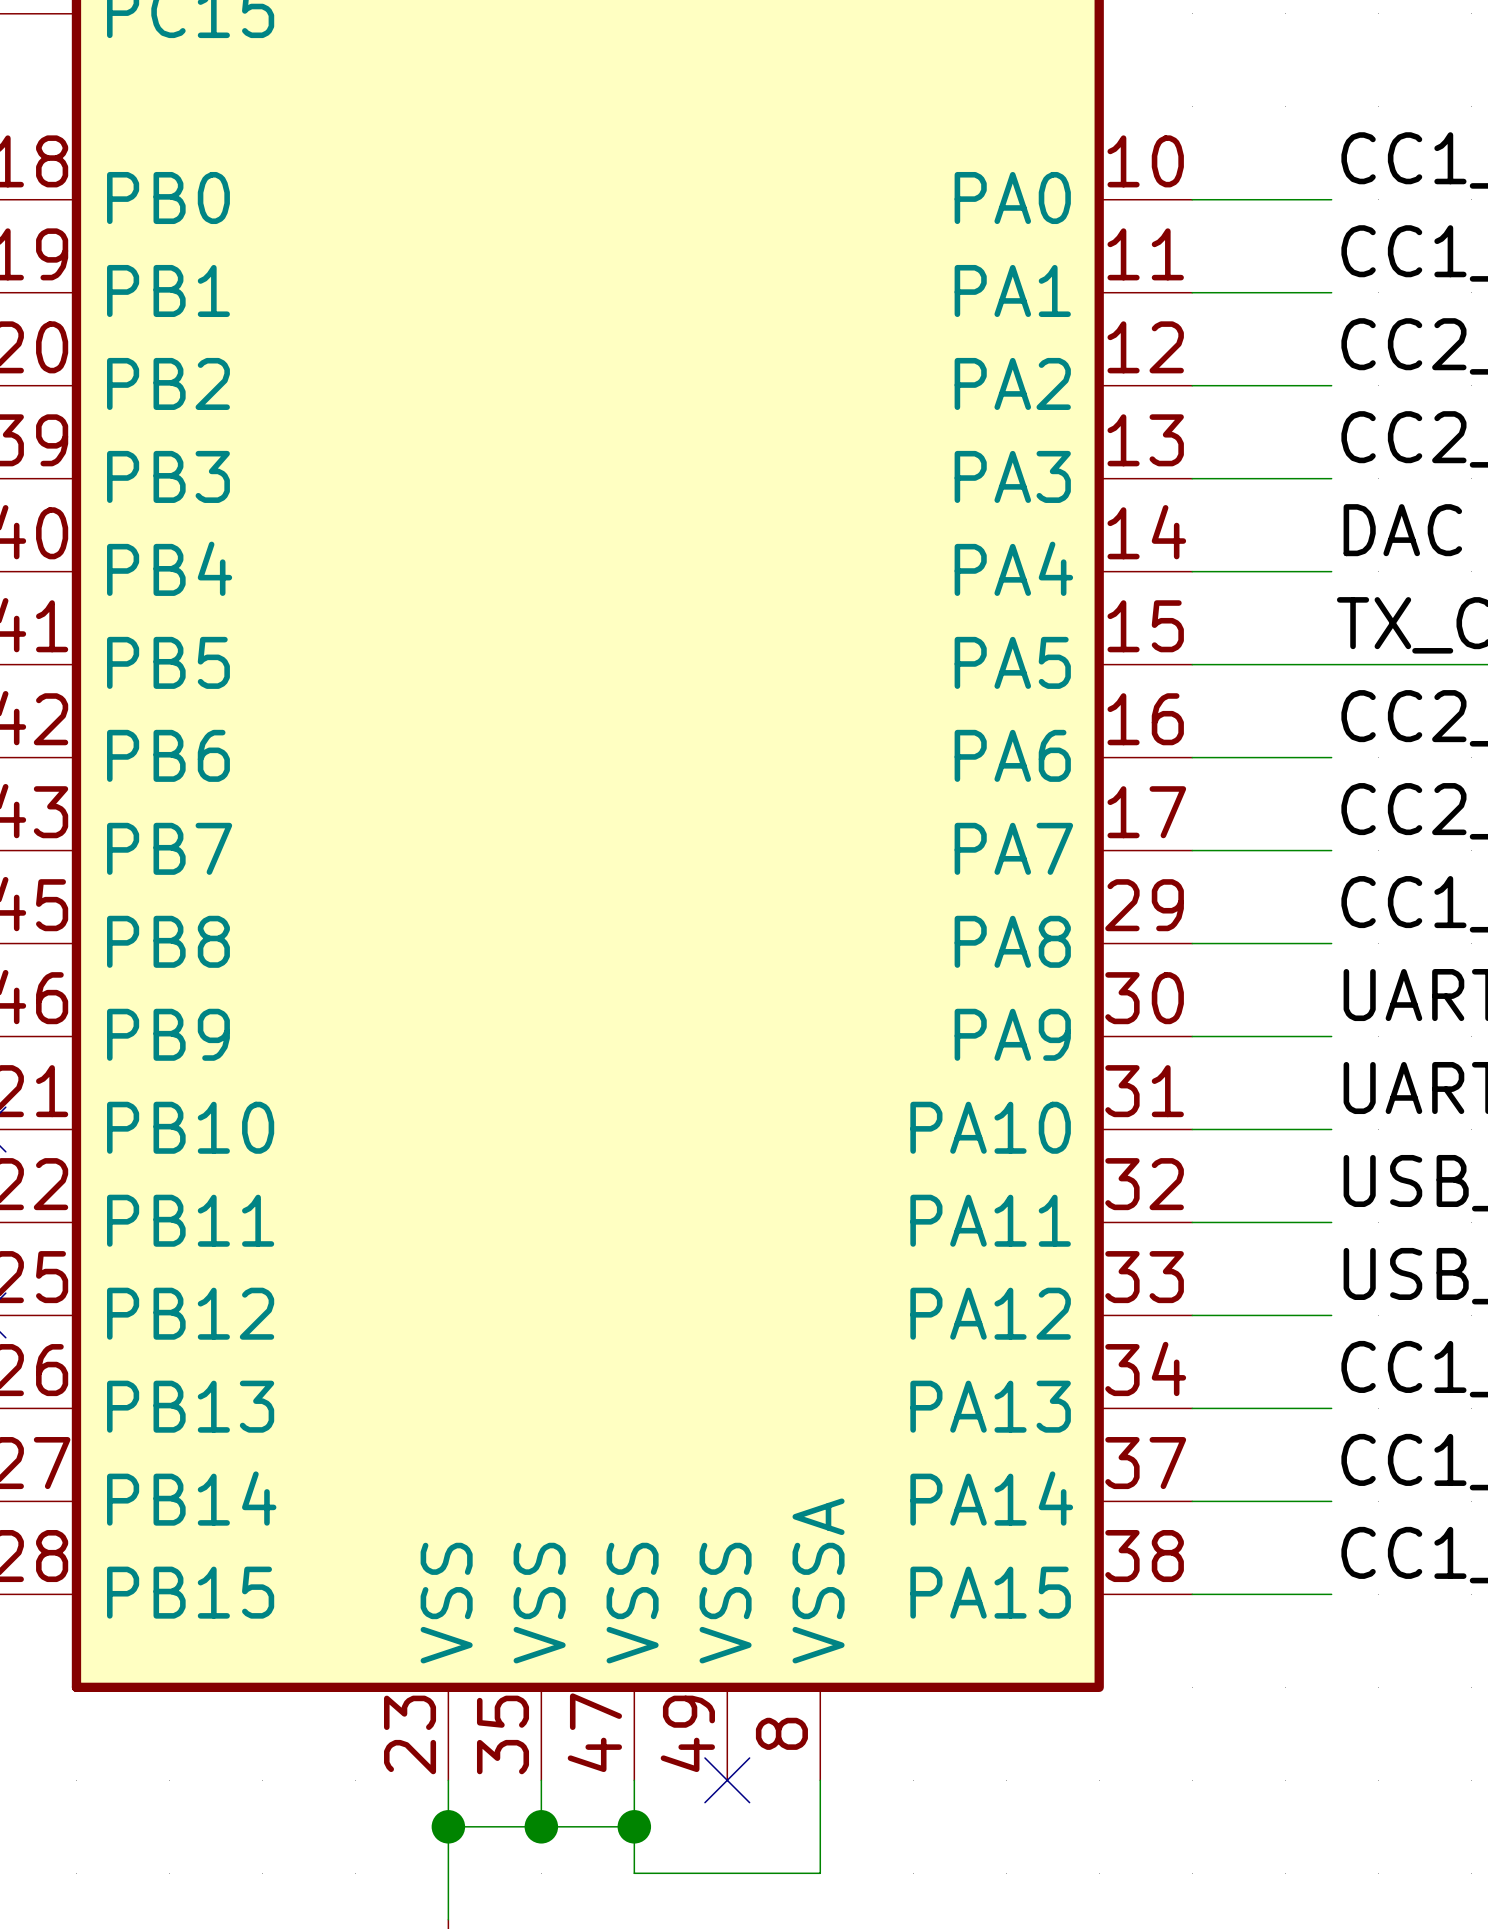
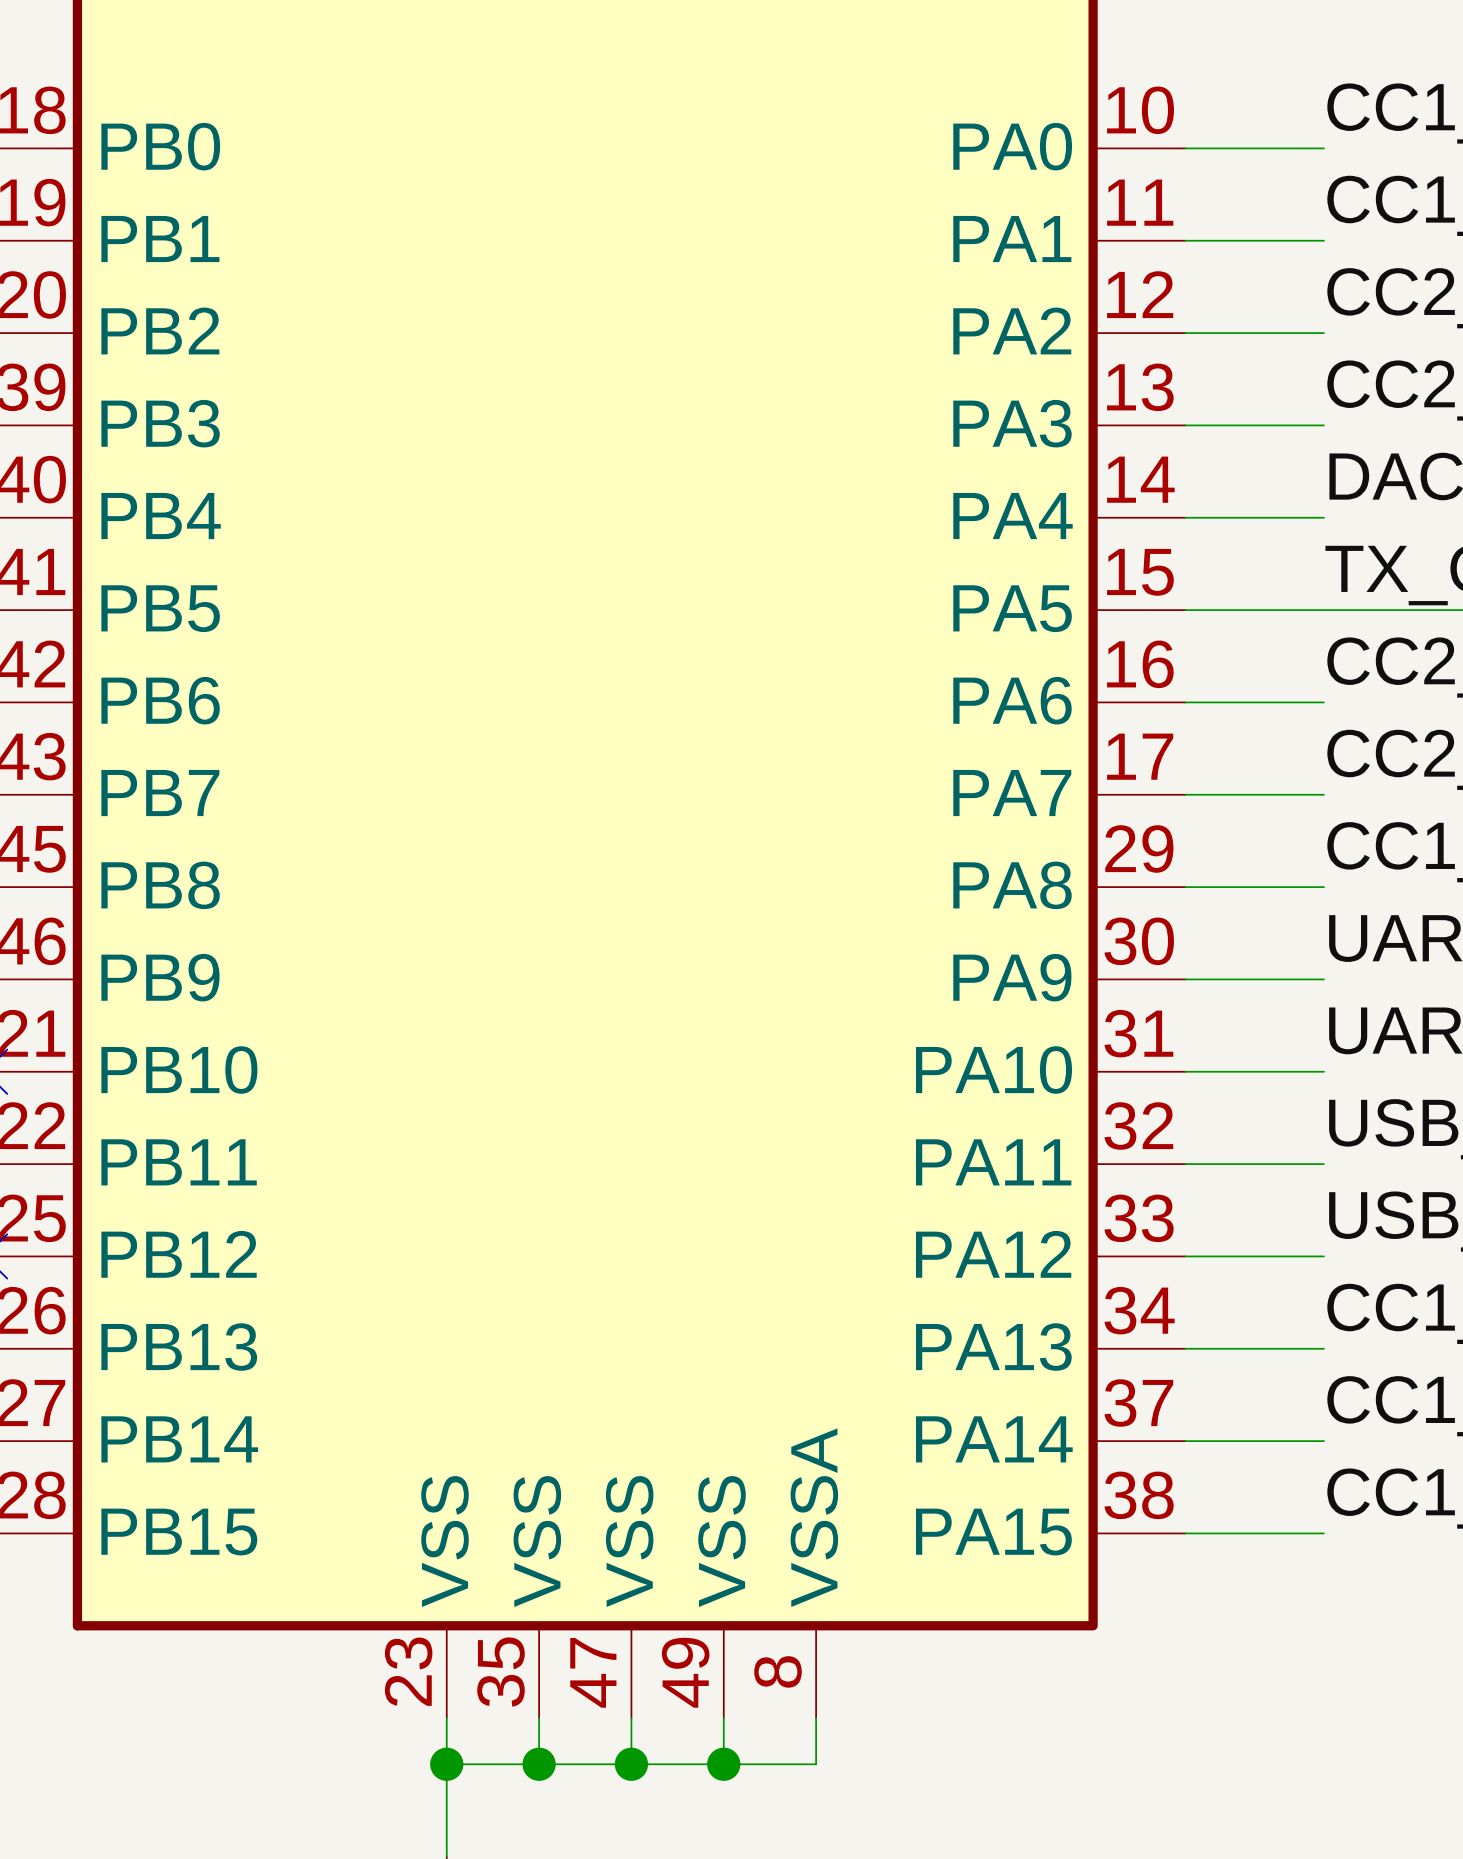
wire: none -> (723, 1718) (723, 1764)
no-connect mark: (727, 1780) -> none
wire: (634, 1826) (634, 1873) (820, 1873) (820, 1826) -> (631, 1764) (816, 1764)
junction: none -> (723, 1764)

